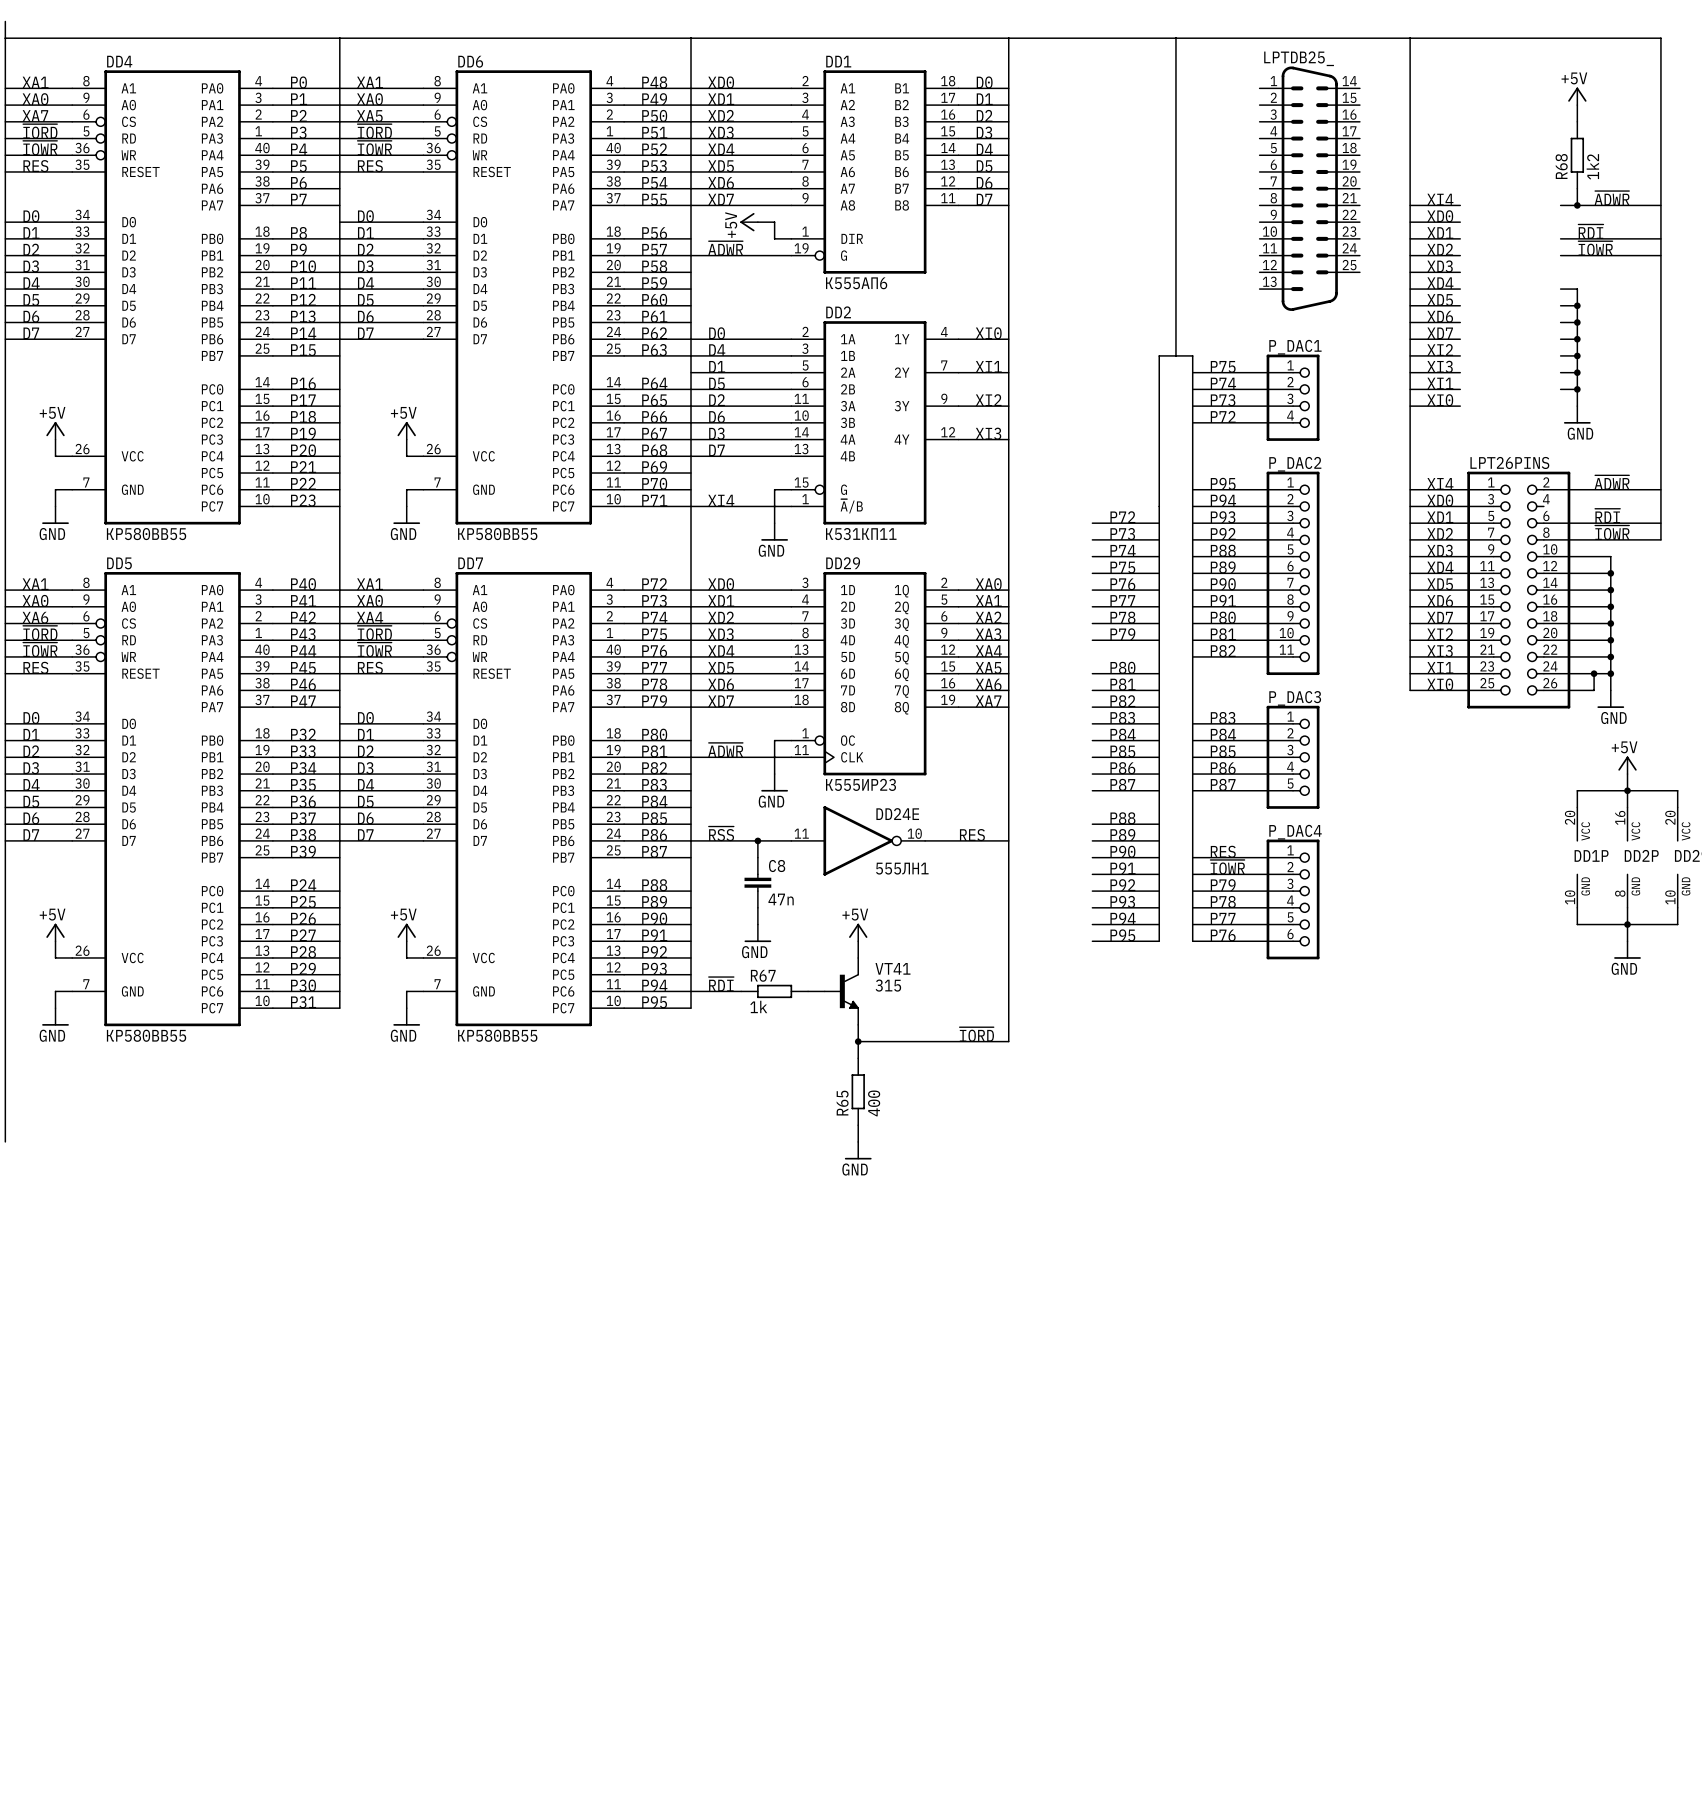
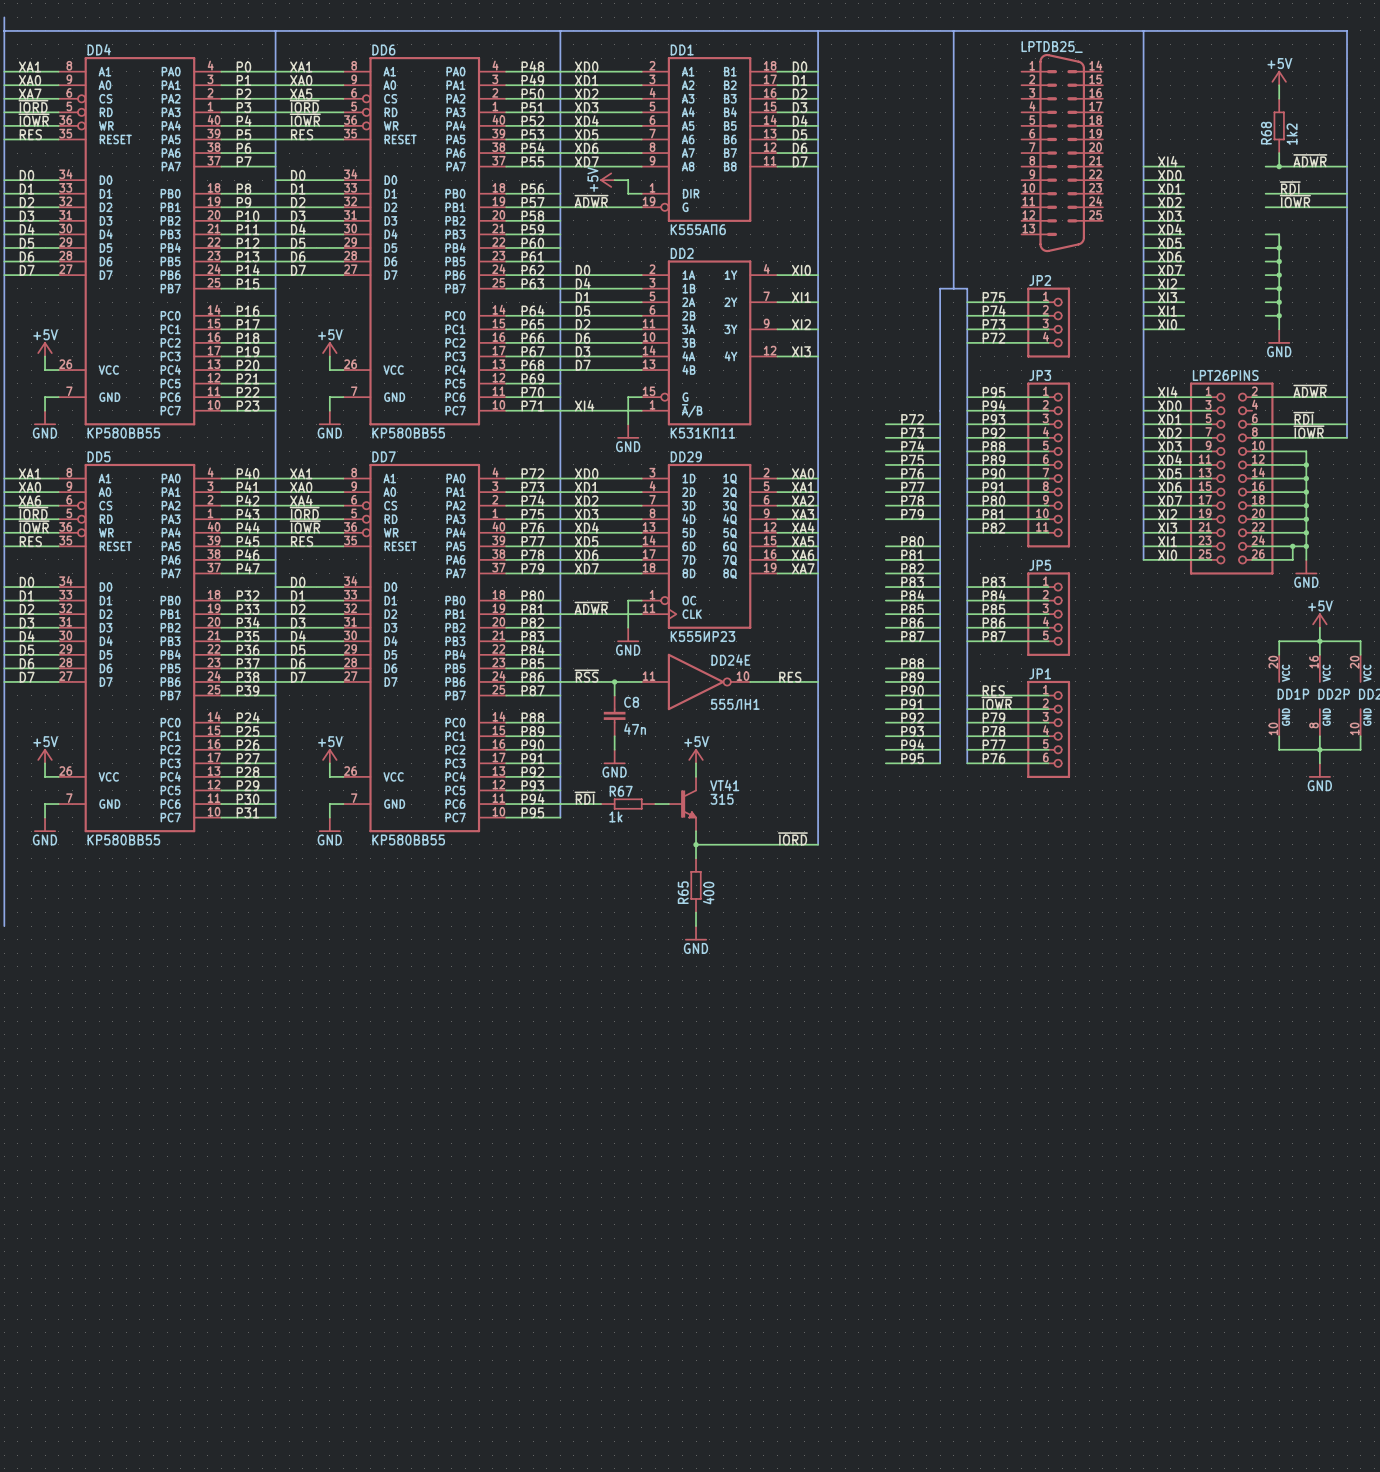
P_DAC1 name: P_DAC1 (1295, 347) -> JP2 (1040, 280)
P_DAC2 name: P_DAC2 (1295, 464) -> JP3 (1040, 375)
P_DAC3 name: P_DAC3 (1295, 698) -> JP5 (1040, 565)
P_DAC4 name: P_DAC4 (1295, 832) -> JP1 (1040, 673)

